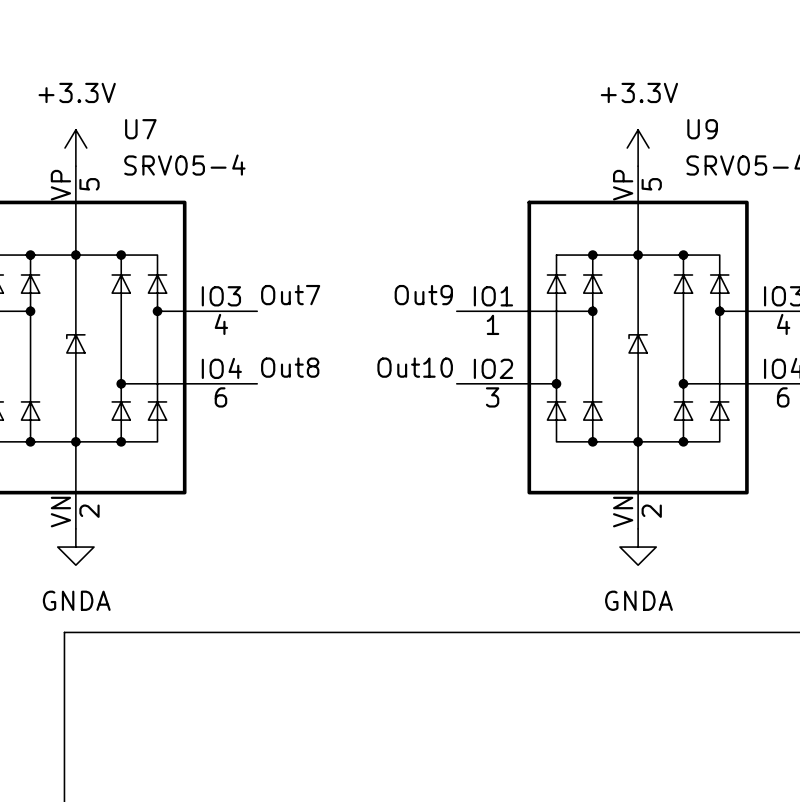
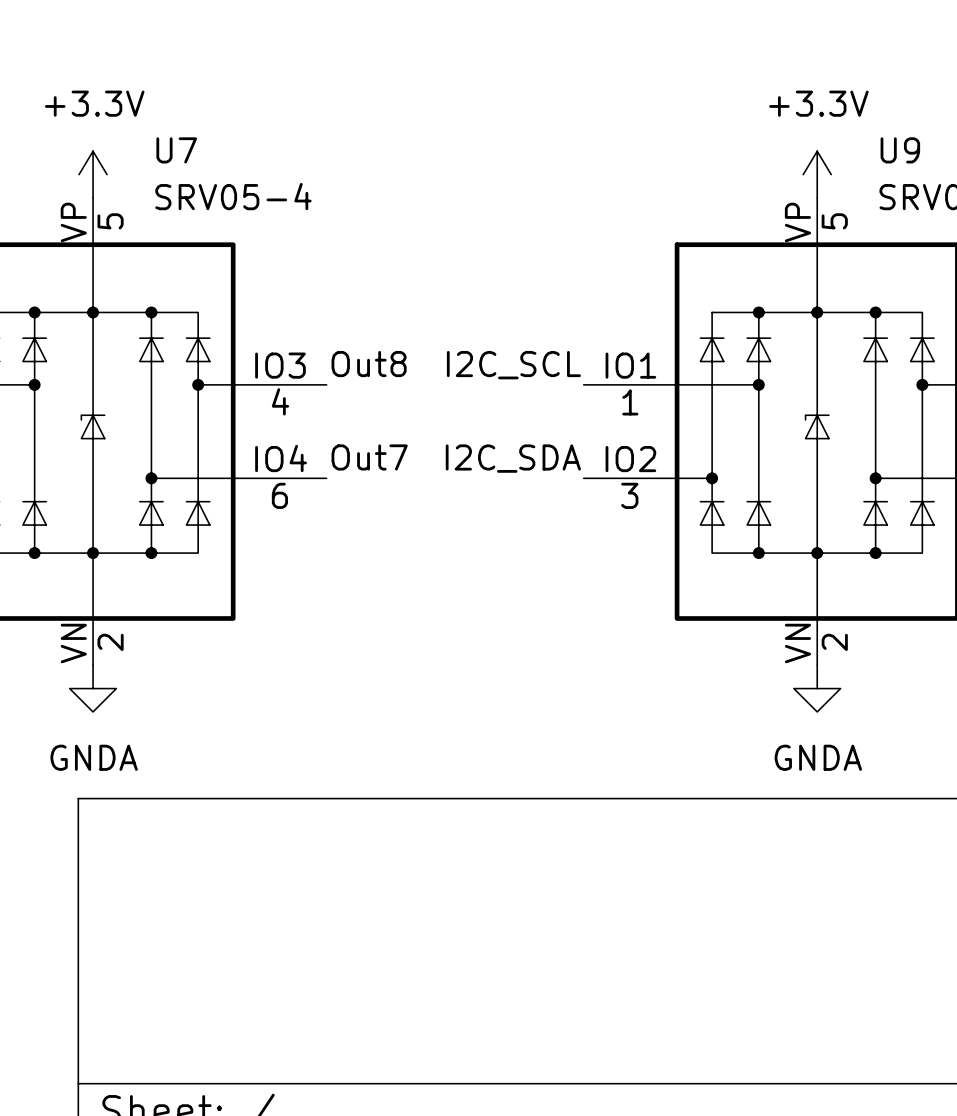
label: Out7 (290, 295) -> Out8 (369, 364)
label: Out9 (423, 295) -> I2C_SCL (513, 365)
label: Out8 (290, 367) -> Out7 (369, 457)
label: Out10 (415, 367) -> I2C_SDA (513, 458)

